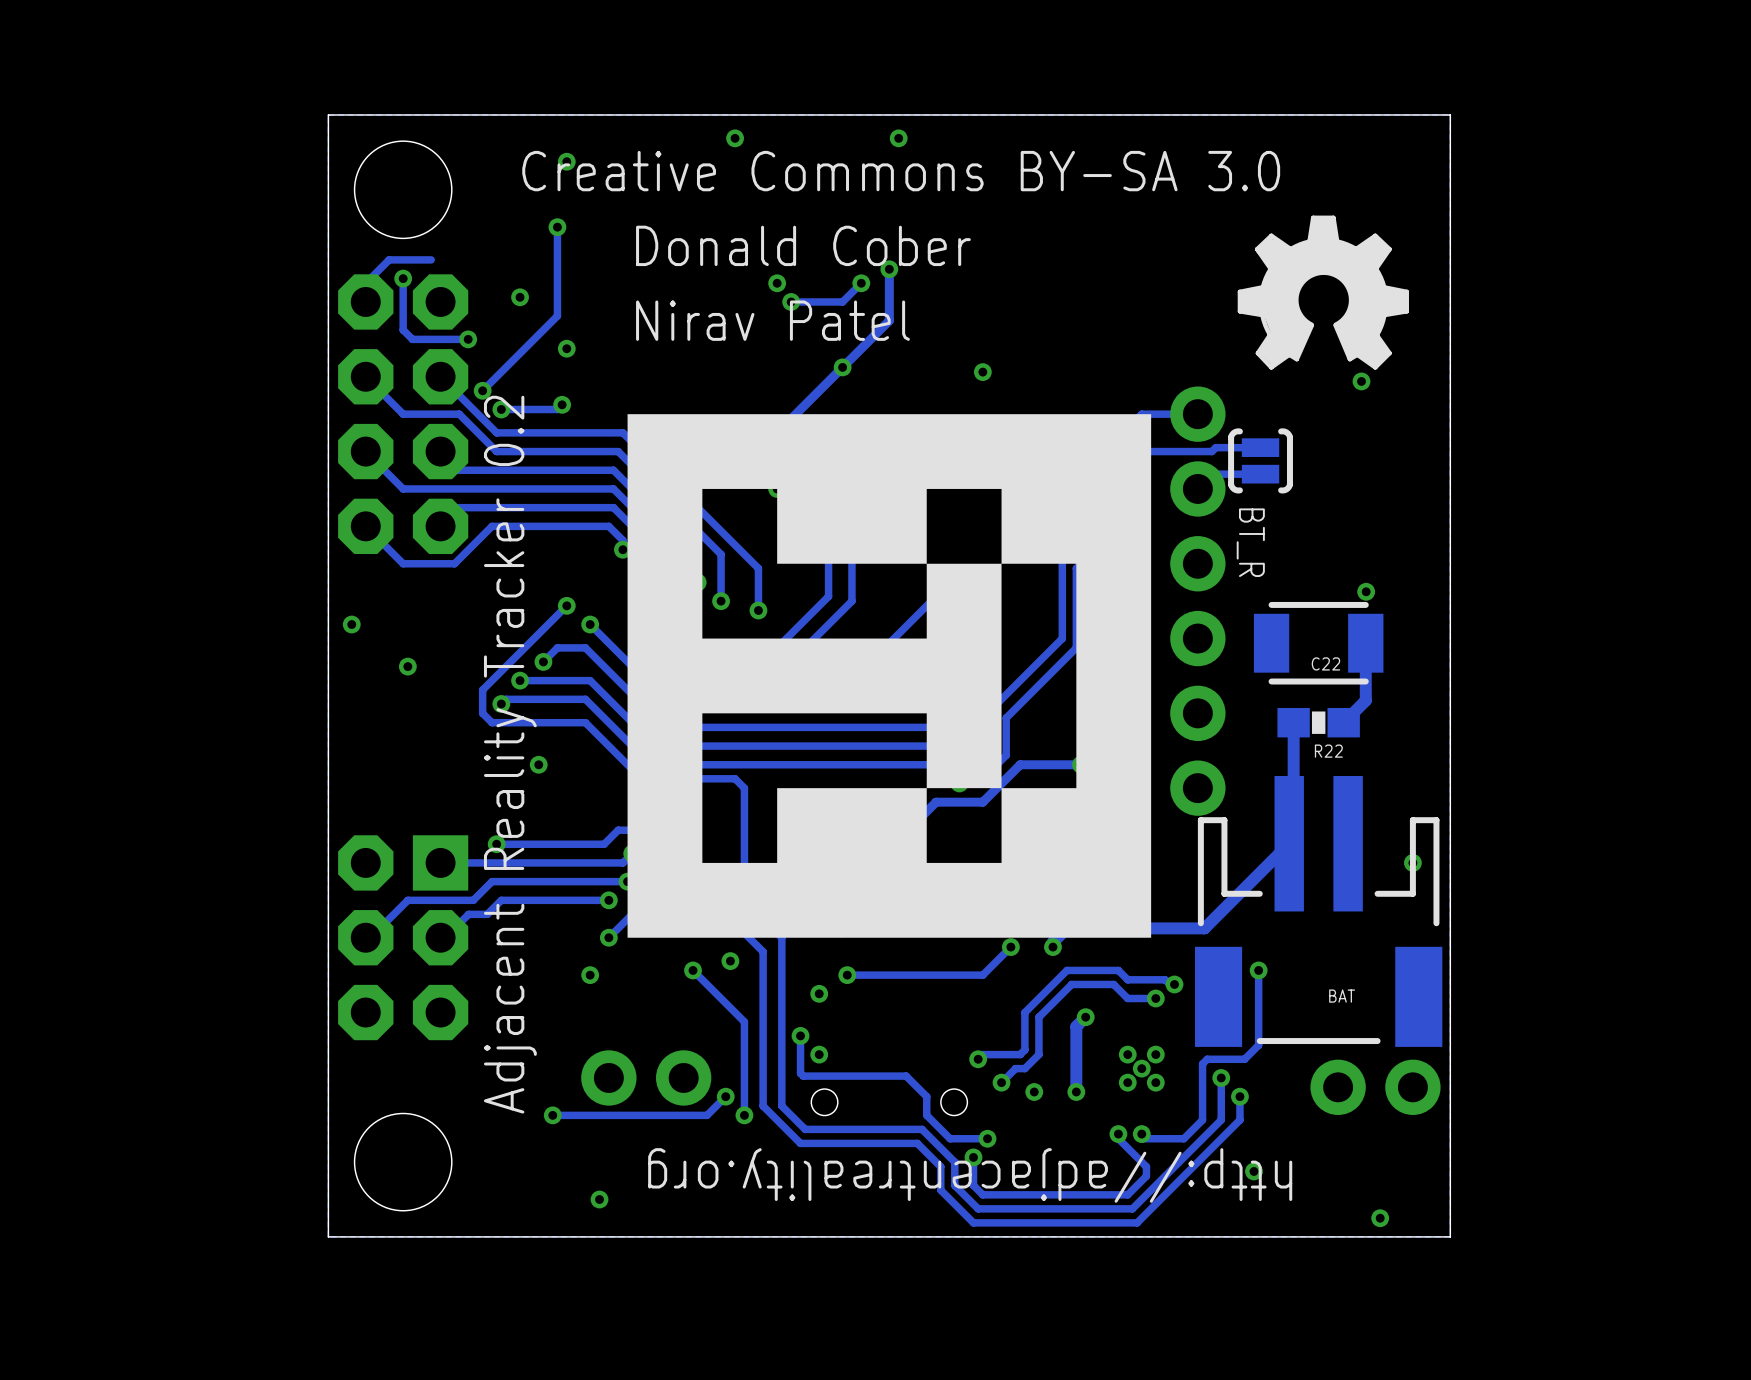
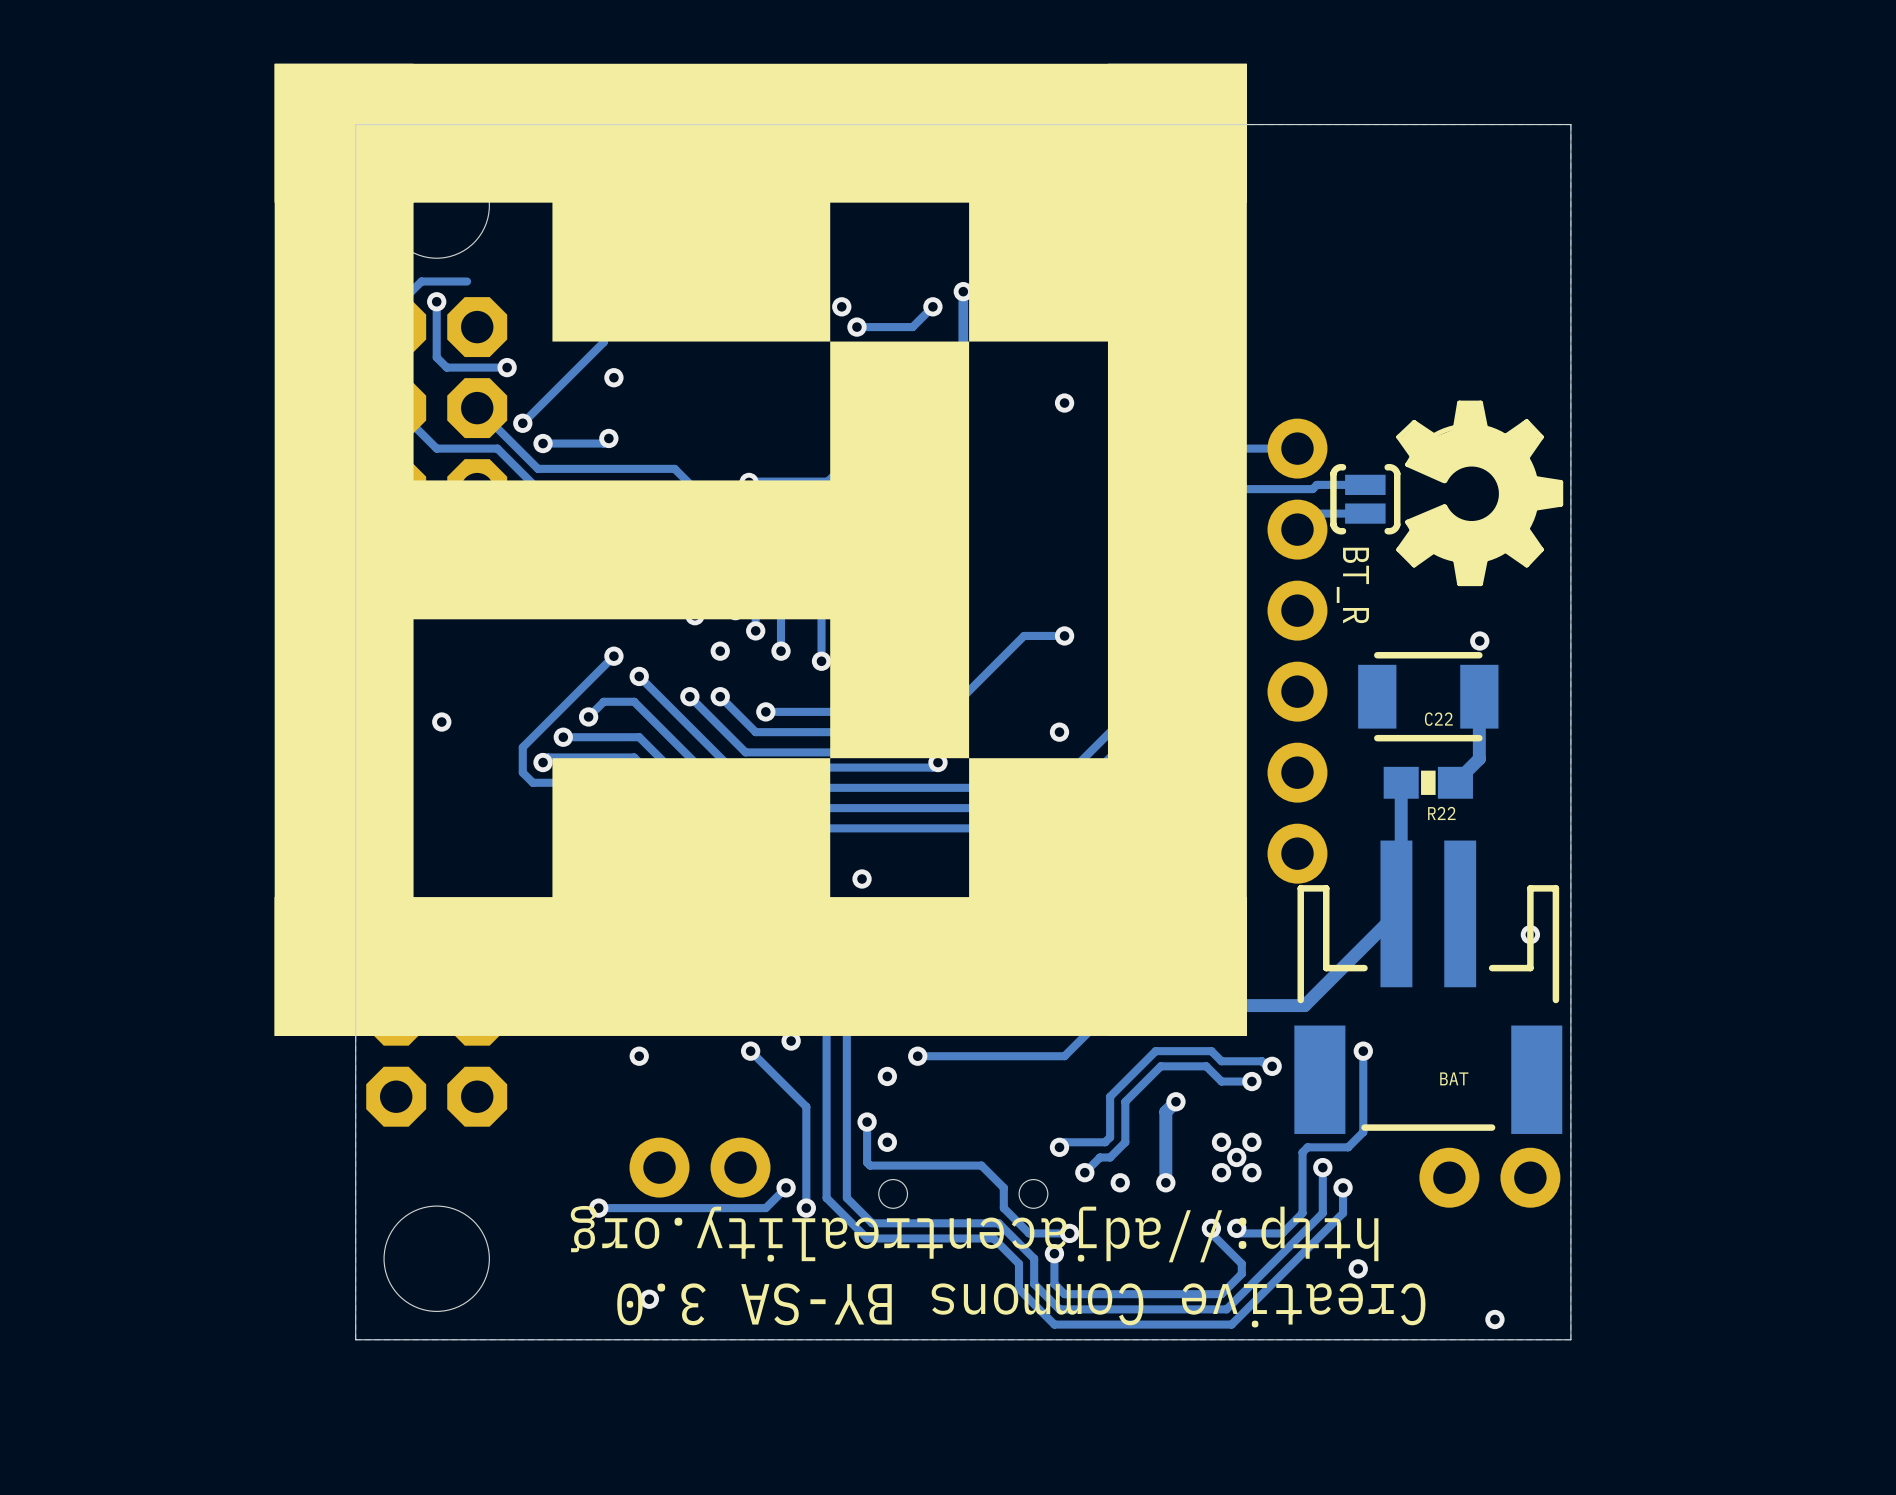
drawing: none -> [274, 63, 1247, 1036]
text: Creative Commons BY-SA 3.0 (901, 171) -> none
drawing: [1237, 215, 1409, 370] -> none
text: Donald Cober (803, 245) -> none
text: Nirav Patel (772, 320) -> none
drawing: none -> [1396, 400, 1564, 587]
drawing: [627, 414, 1152, 938] -> none
drawing shape: [777, 488, 927, 564] -> [830, 341, 970, 759]
text: Adjacent Reality Tracker 0.2 (510, 754) -> none
text position: http://adjacentreality.org (970, 1175) -> http://adjacentreality.org (974, 1234)
text: none -> Creative Commons BY-SA 3.0 (1021, 1305)

